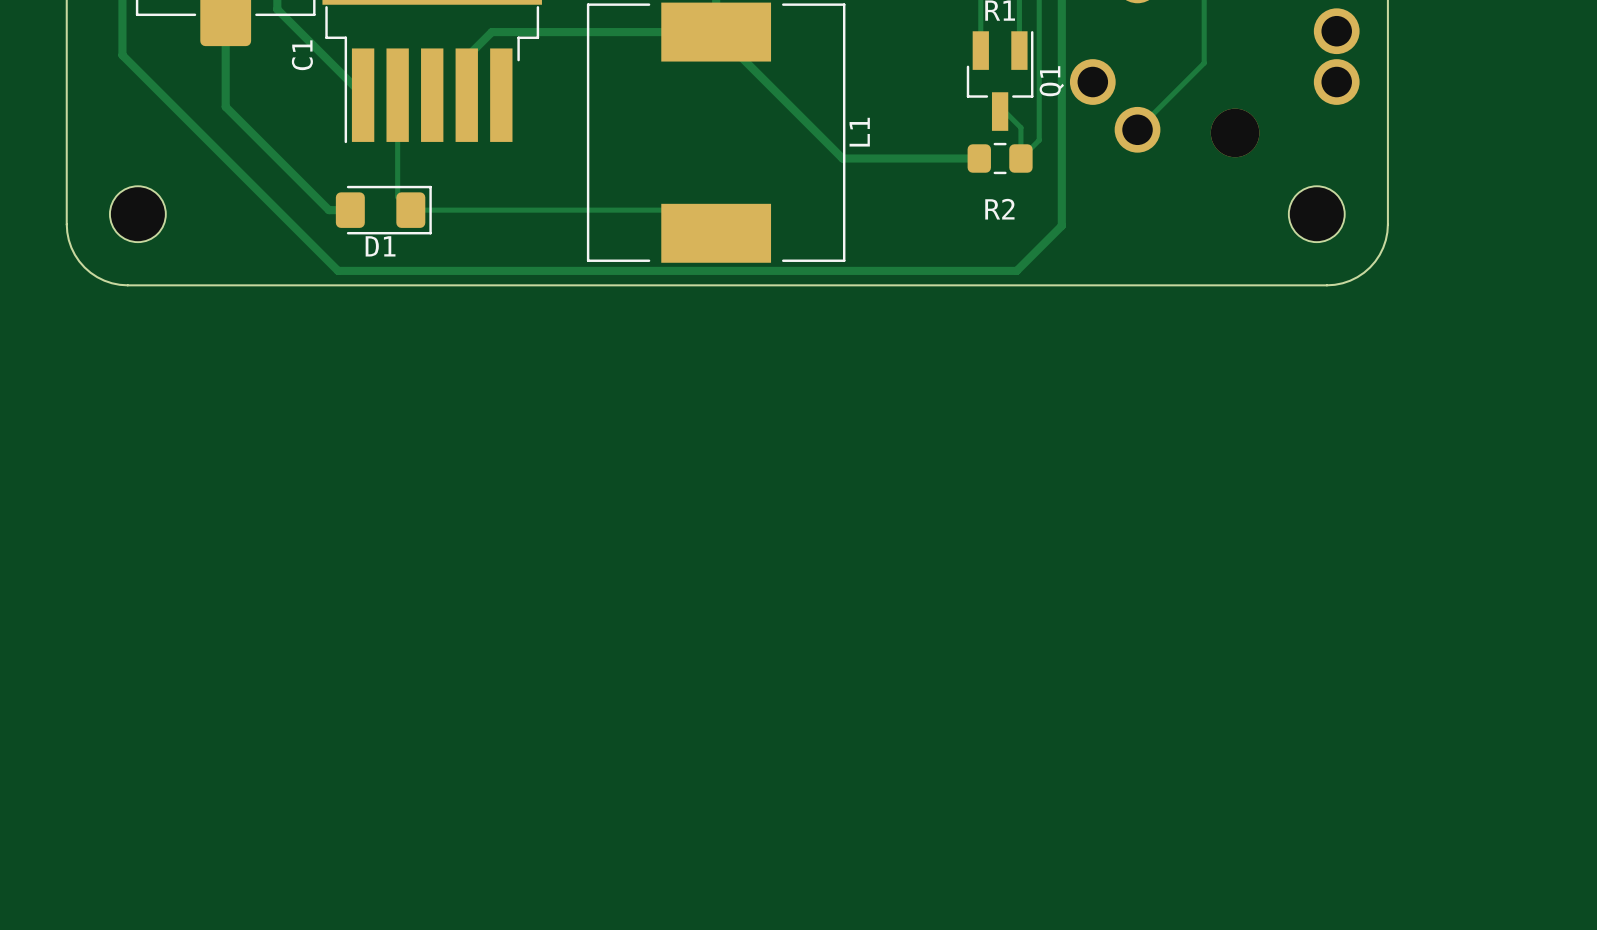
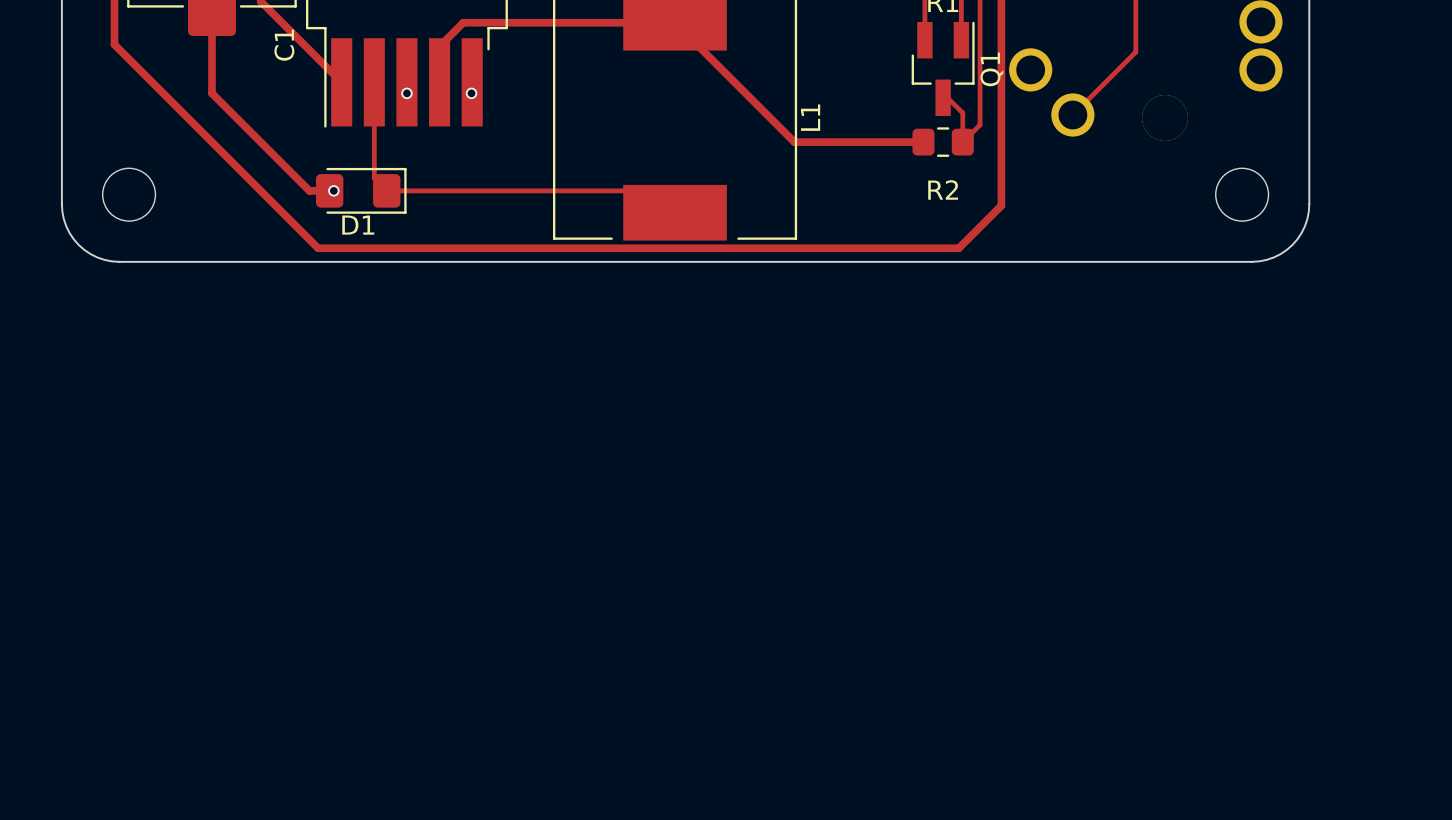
via: none -> (406, 93)
via: none -> (471, 93)
via: none -> (333, 190)

